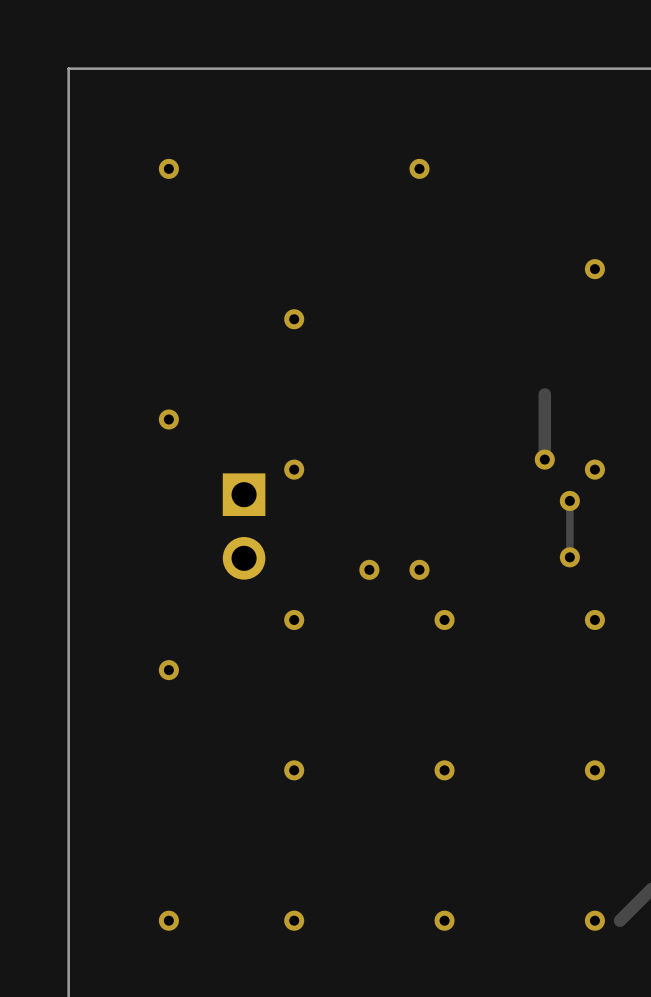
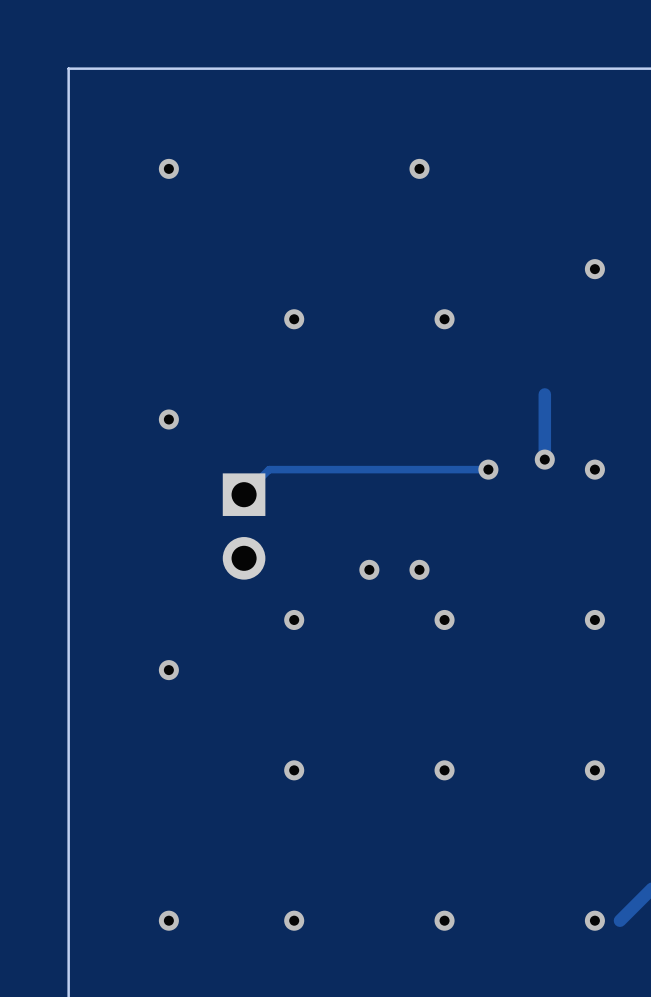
via: none -> (444, 319)
via: (294, 469) -> none
track: none -> (488, 469) (269, 469) (244, 494)
via: none -> (488, 469)
track: (569, 500) (569, 557) -> none
via: (569, 500) -> none
via: (569, 557) -> none

